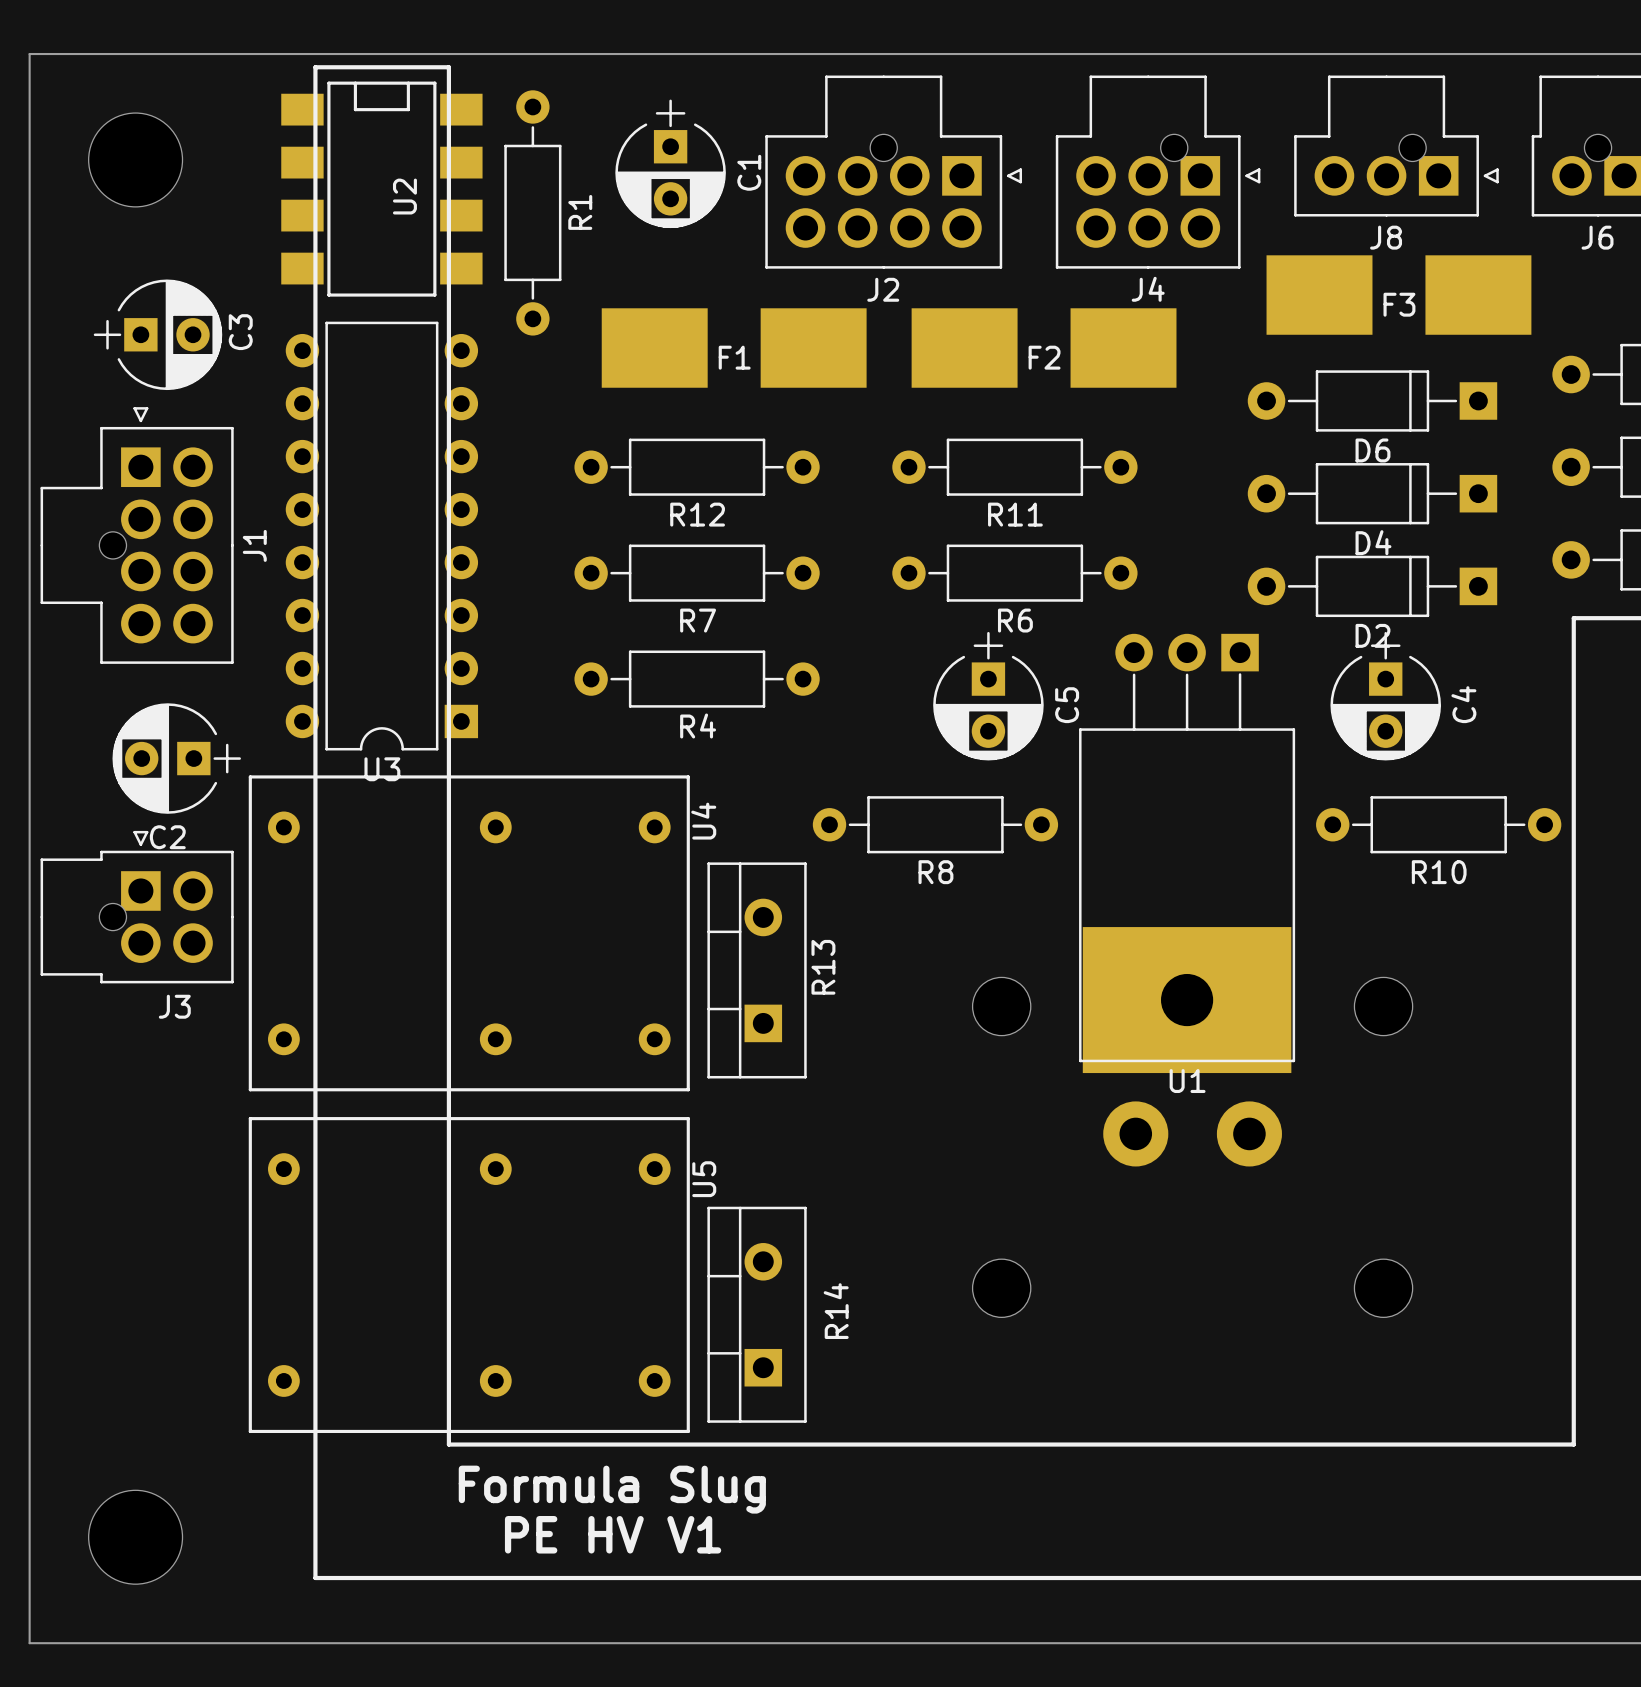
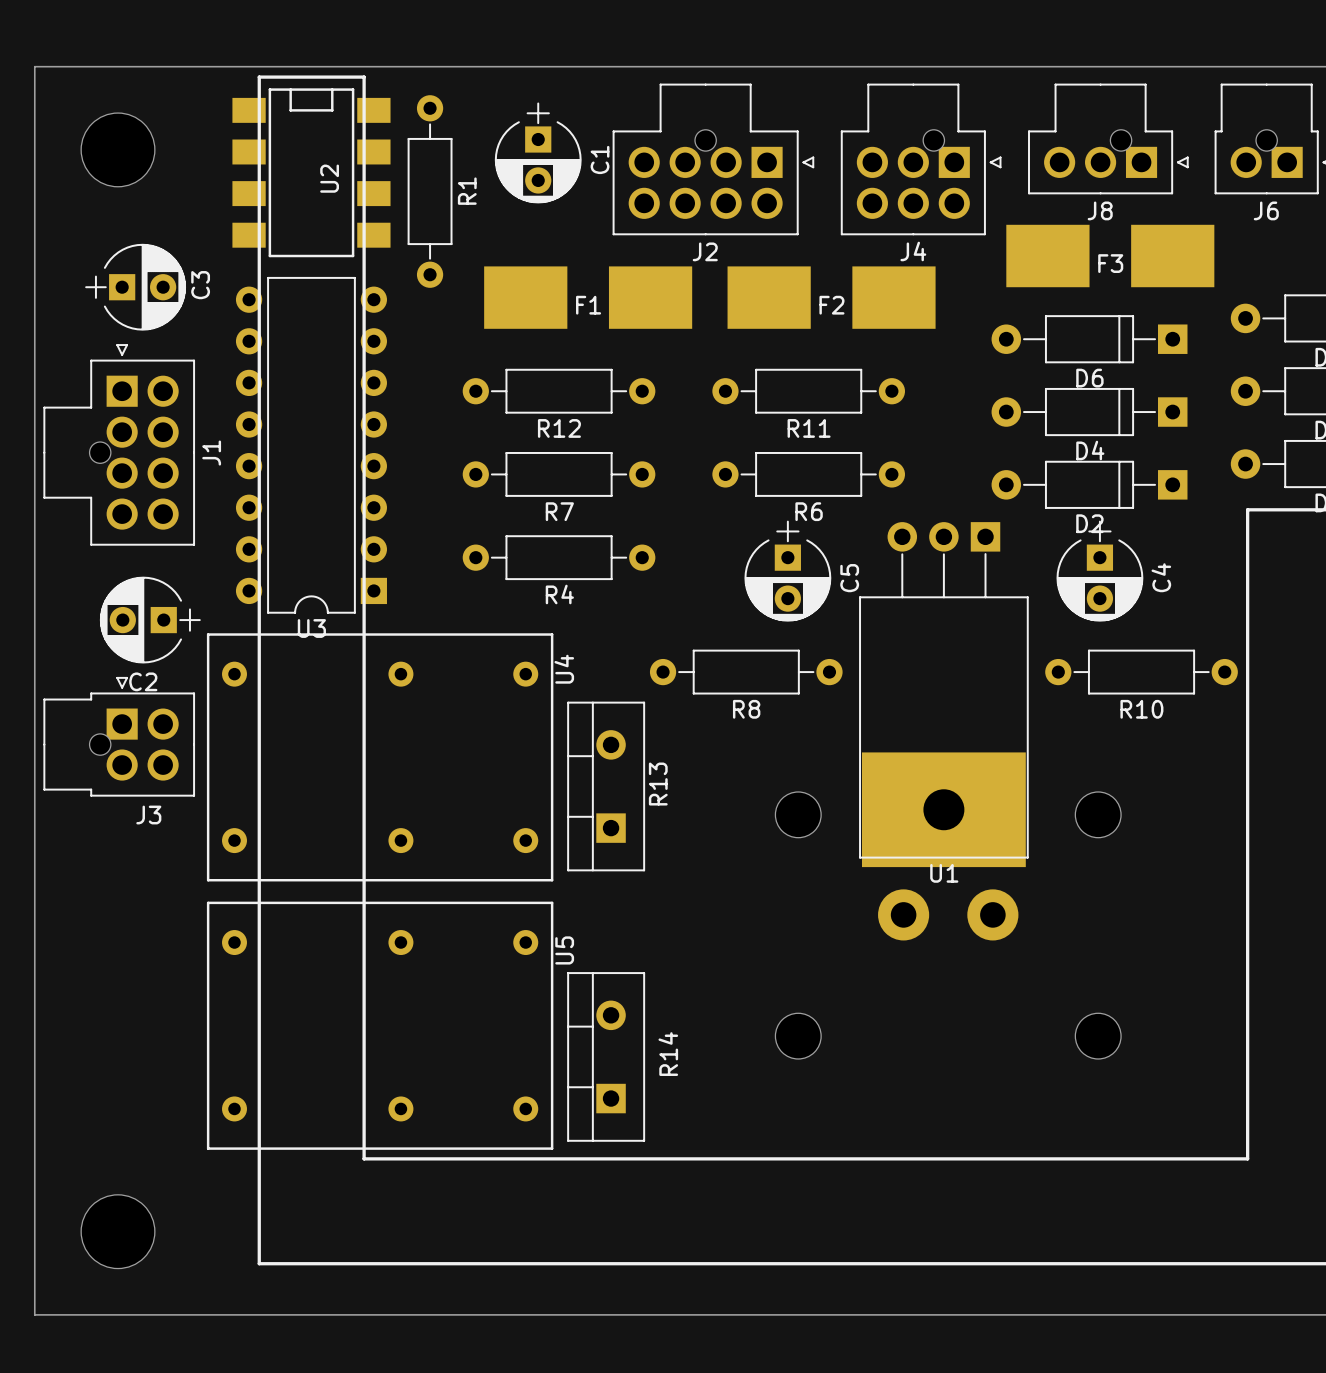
text: Formula Slug (612, 1489) -> none
text: PE HV V1 (613, 1534) -> none

